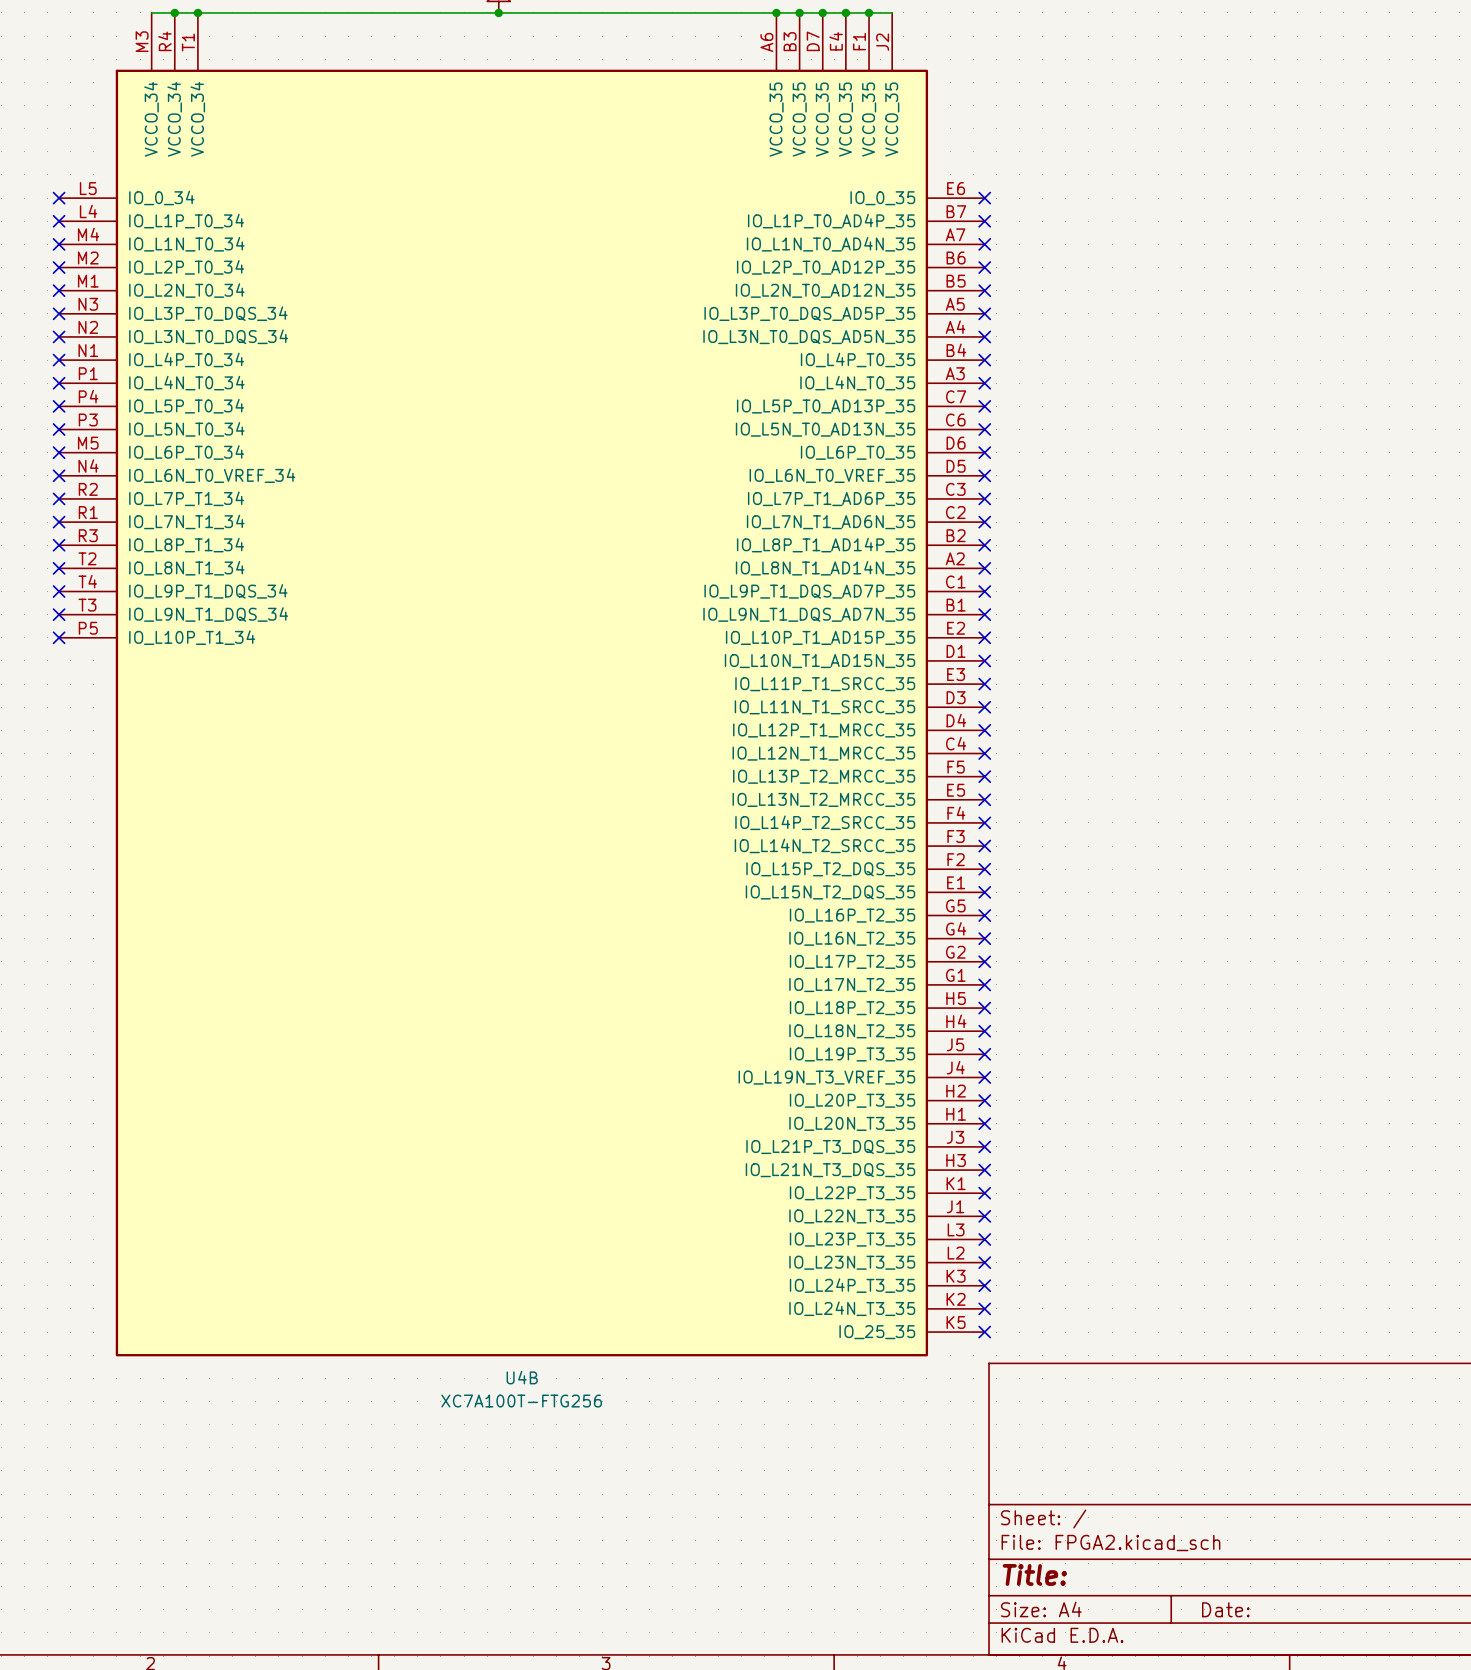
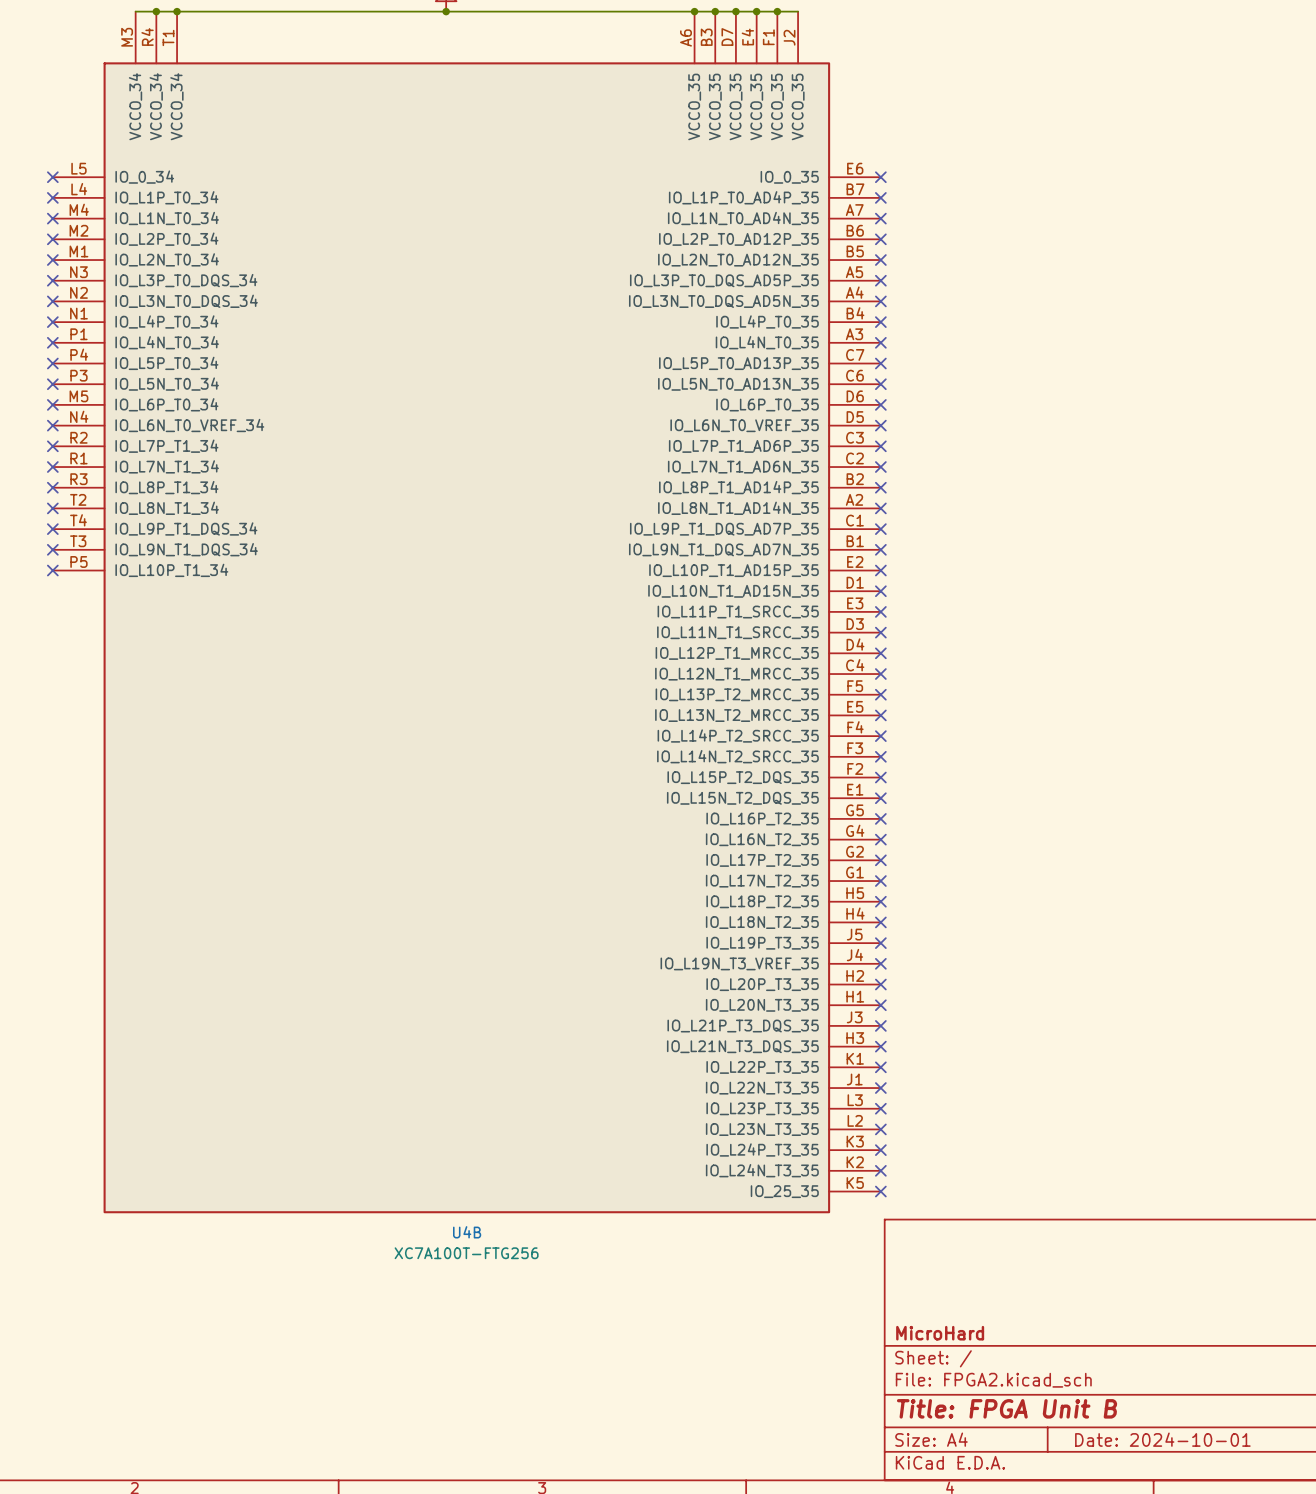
title block: none -> MicroHard (940, 1333)
title block: Title: (1034, 1574) -> Title: FPGA Unit B (1007, 1408)
title block: Date: (1225, 1609) -> Date: 2024-10-01 (1162, 1439)

